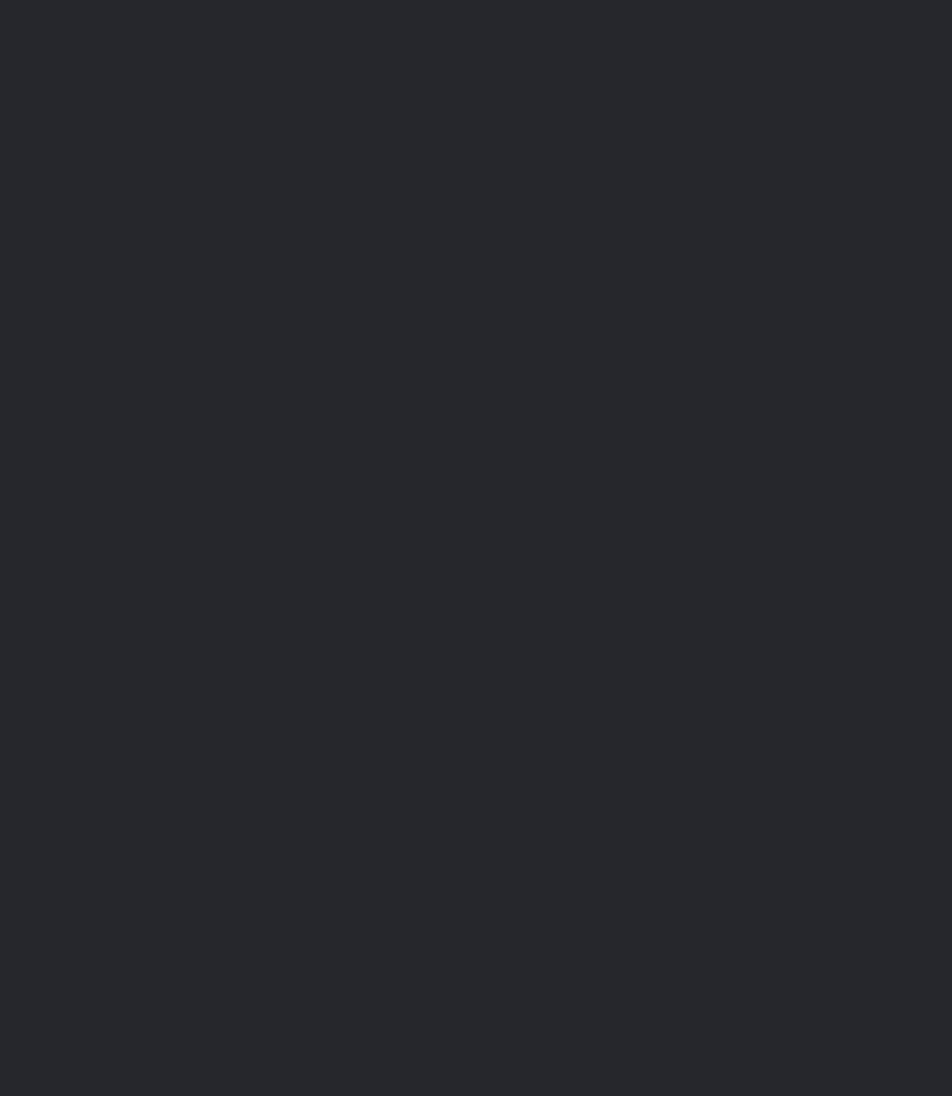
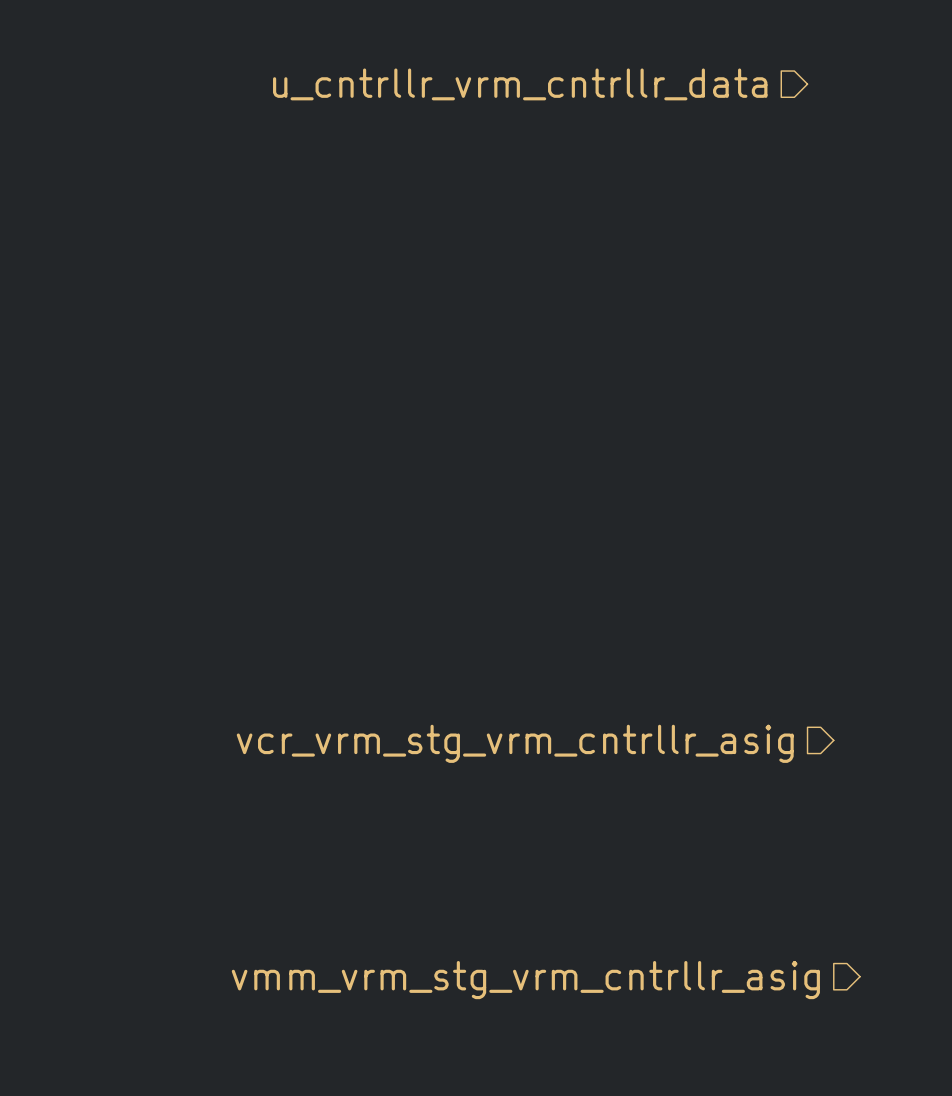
hierarchical label: none -> u_cntrllr_vrm_cntrllr_data (520, 84)
hierarchical label: none -> vcr_vrm_stg_vrm_cntrllr_asig (515, 743)
hierarchical label: none -> vmm_vrm_stg_vrm_cntrllr_asig (525, 980)

